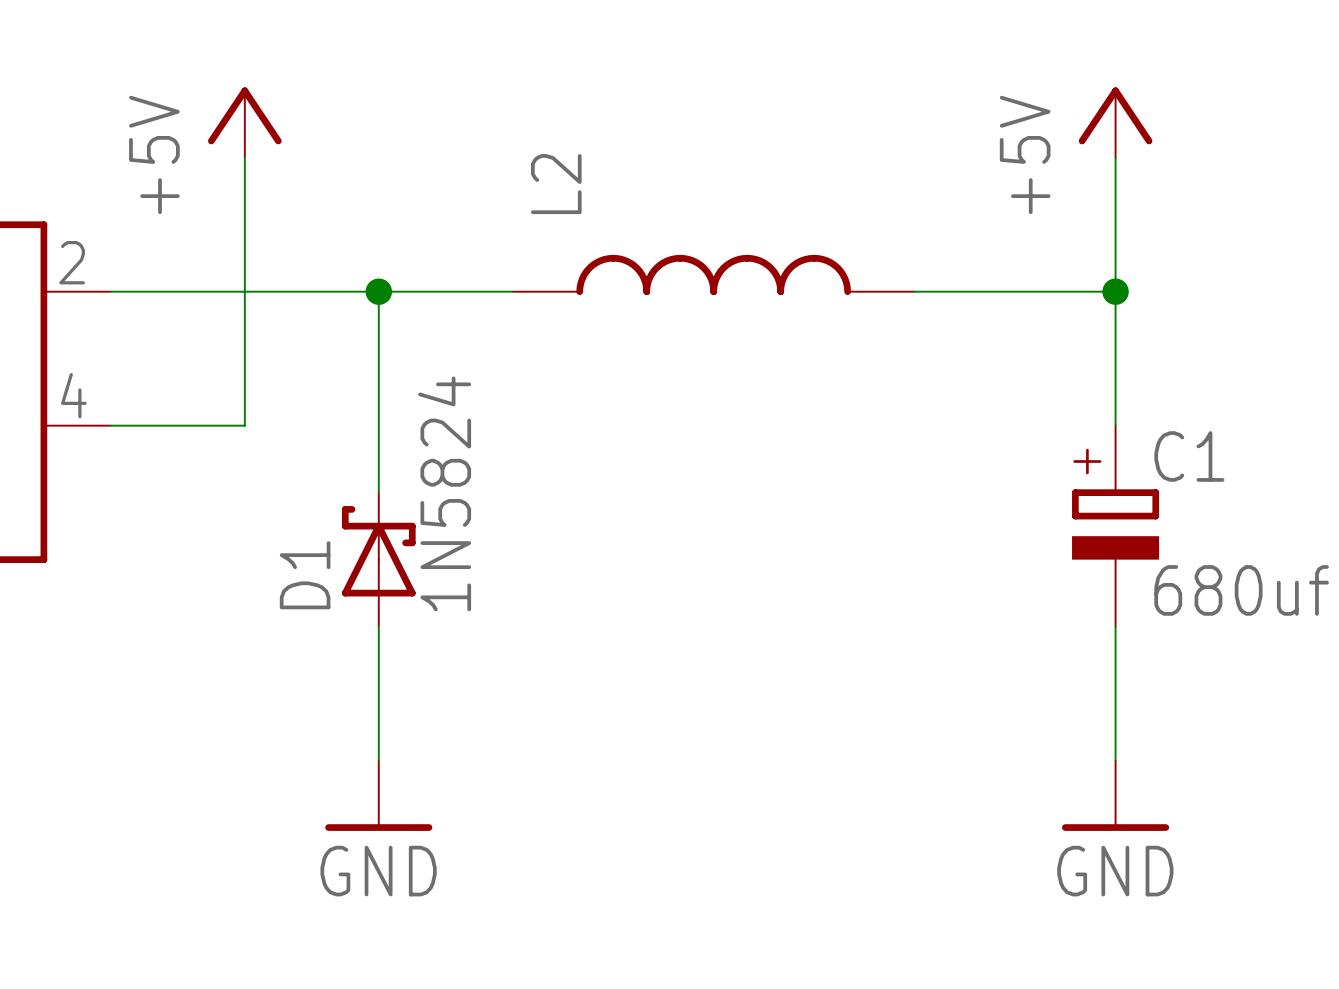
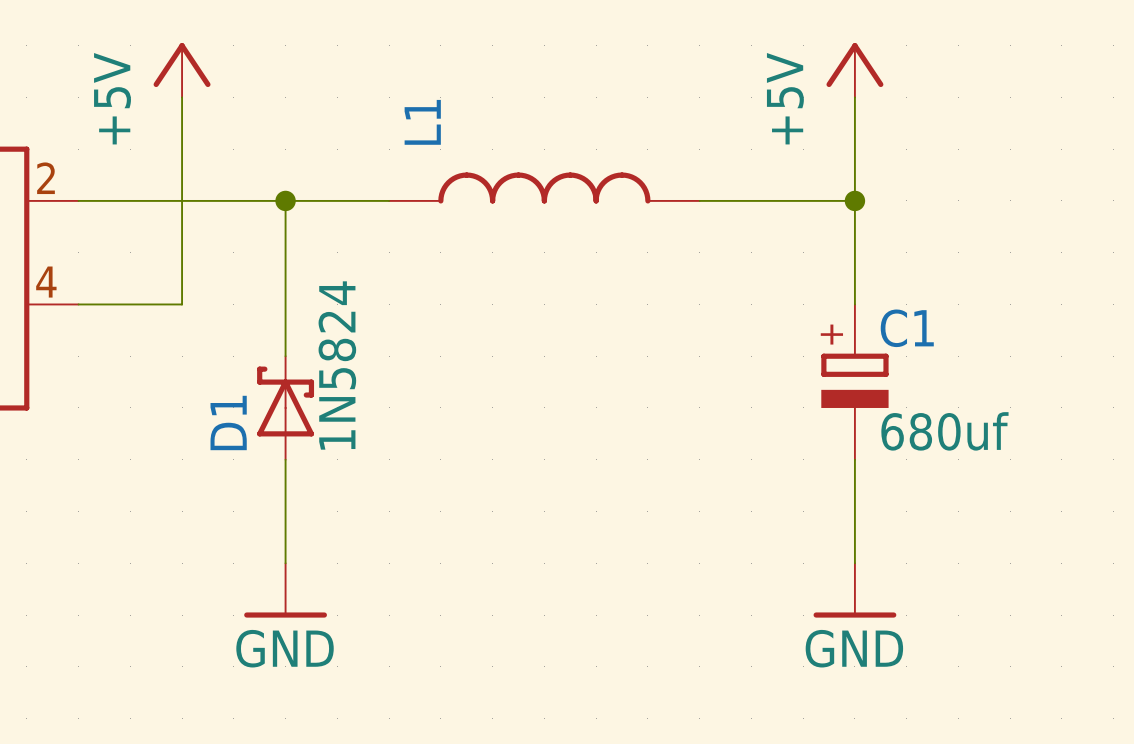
L2 name: L2 (556, 184) -> L1 (422, 122)

